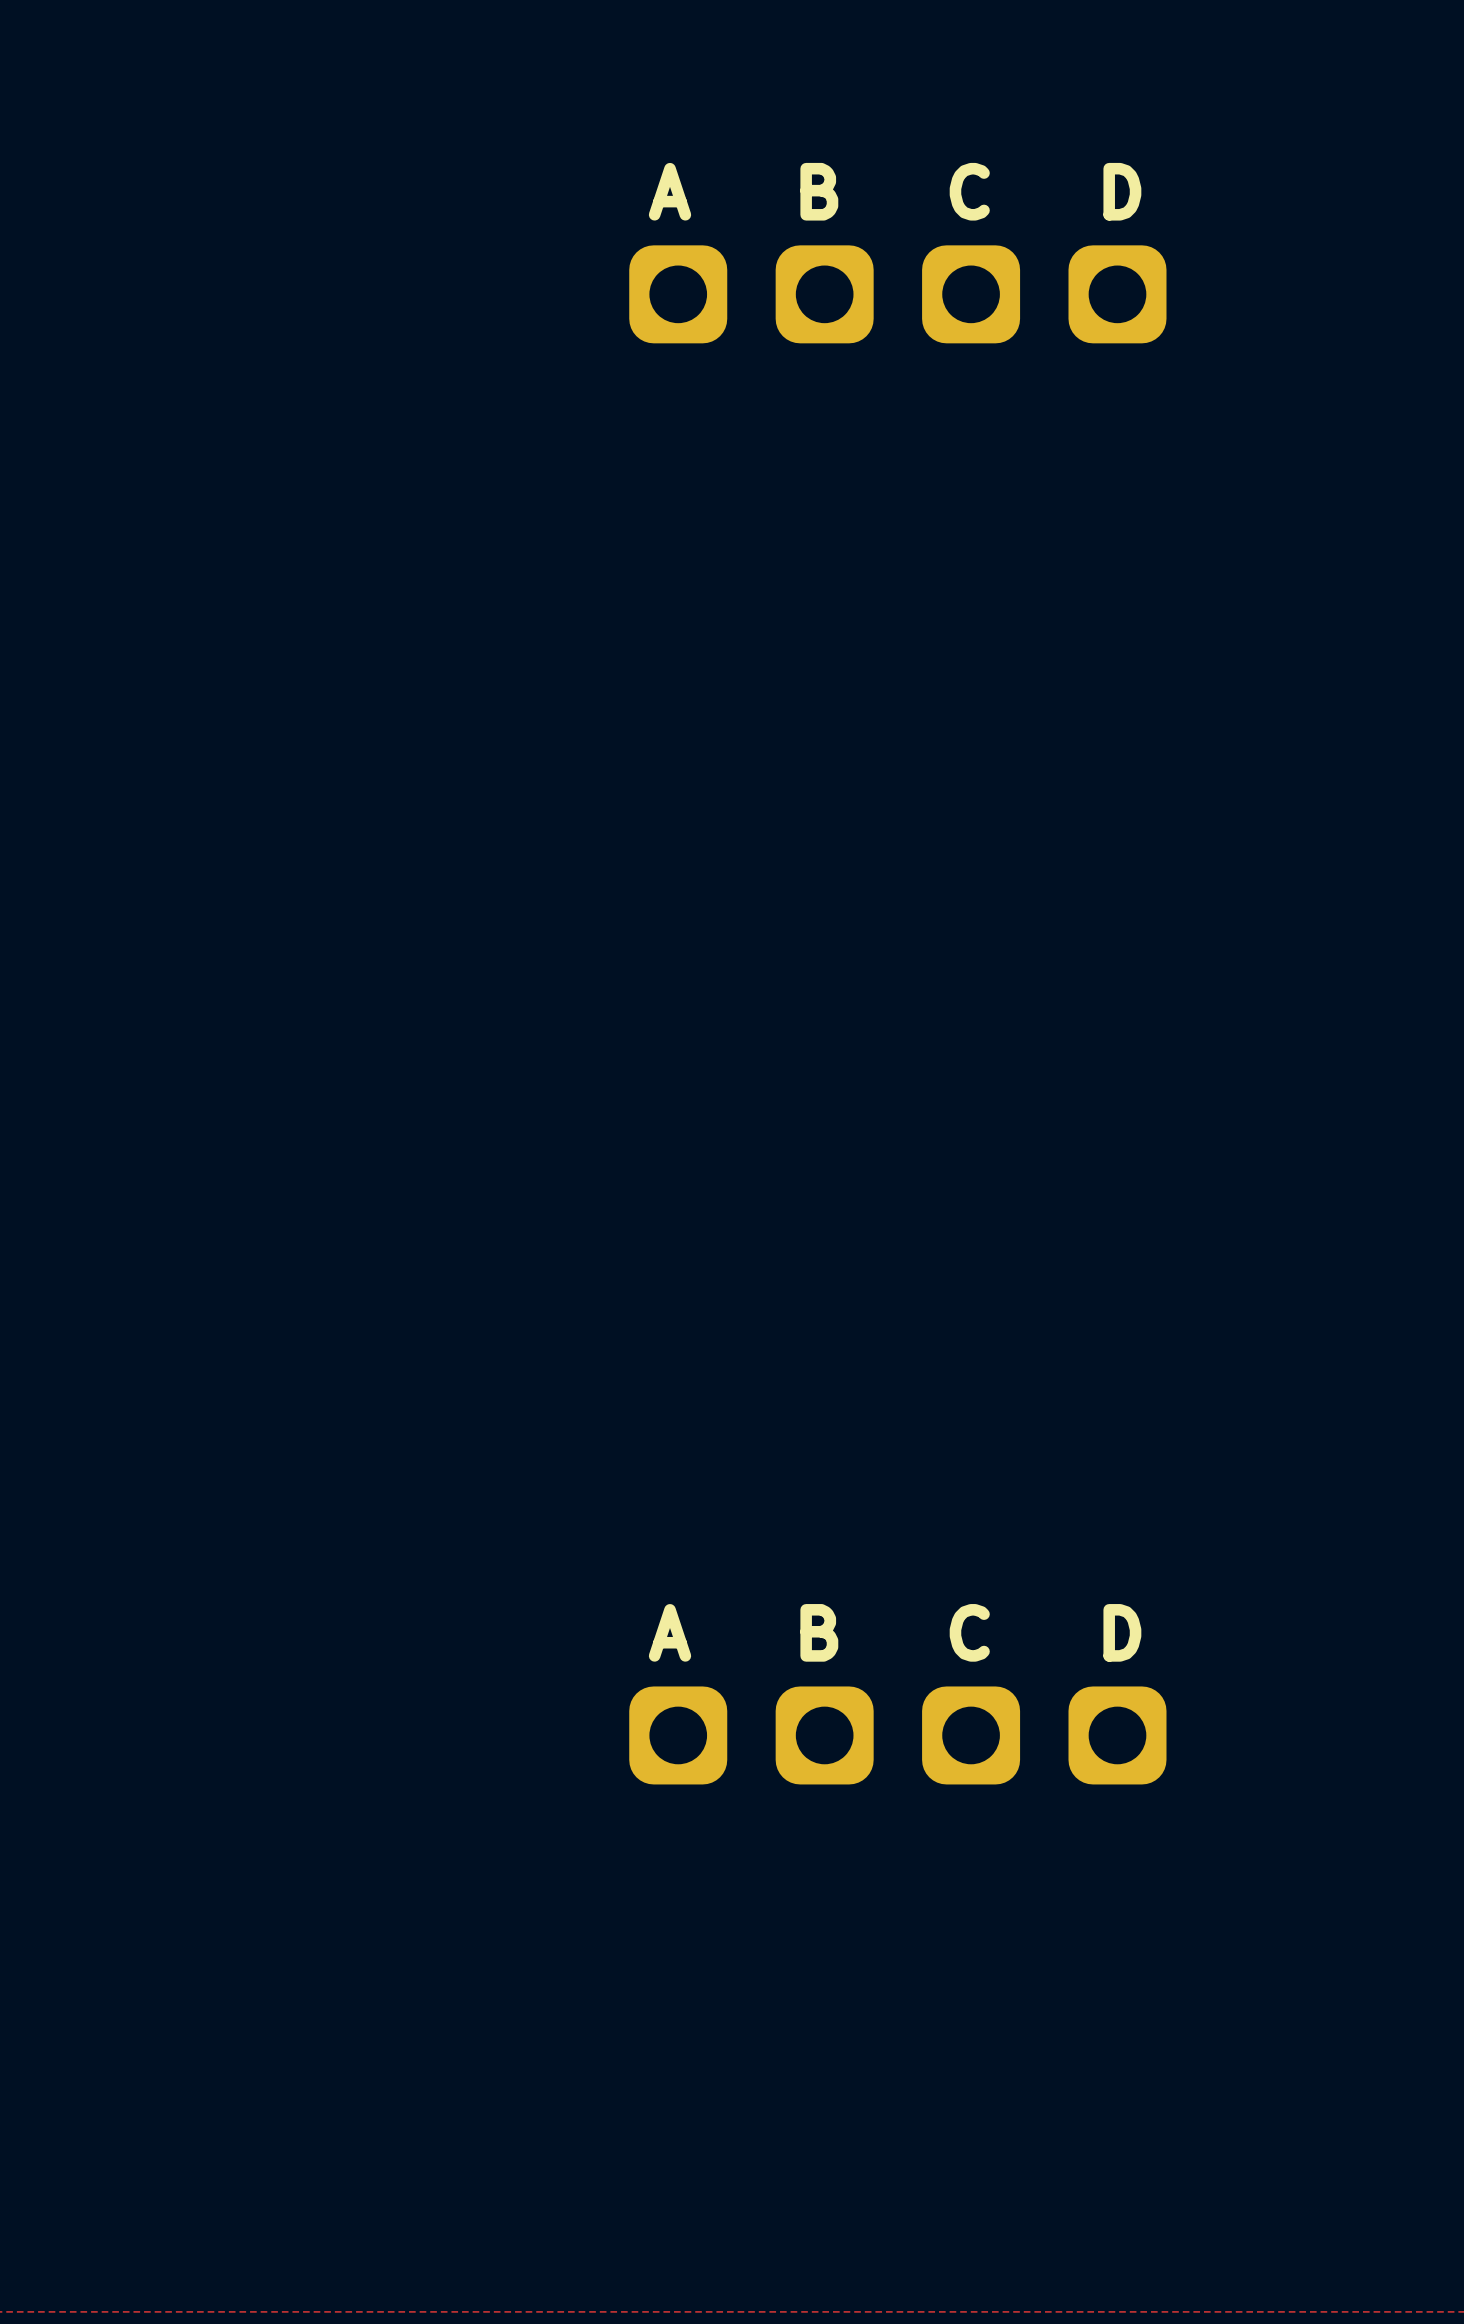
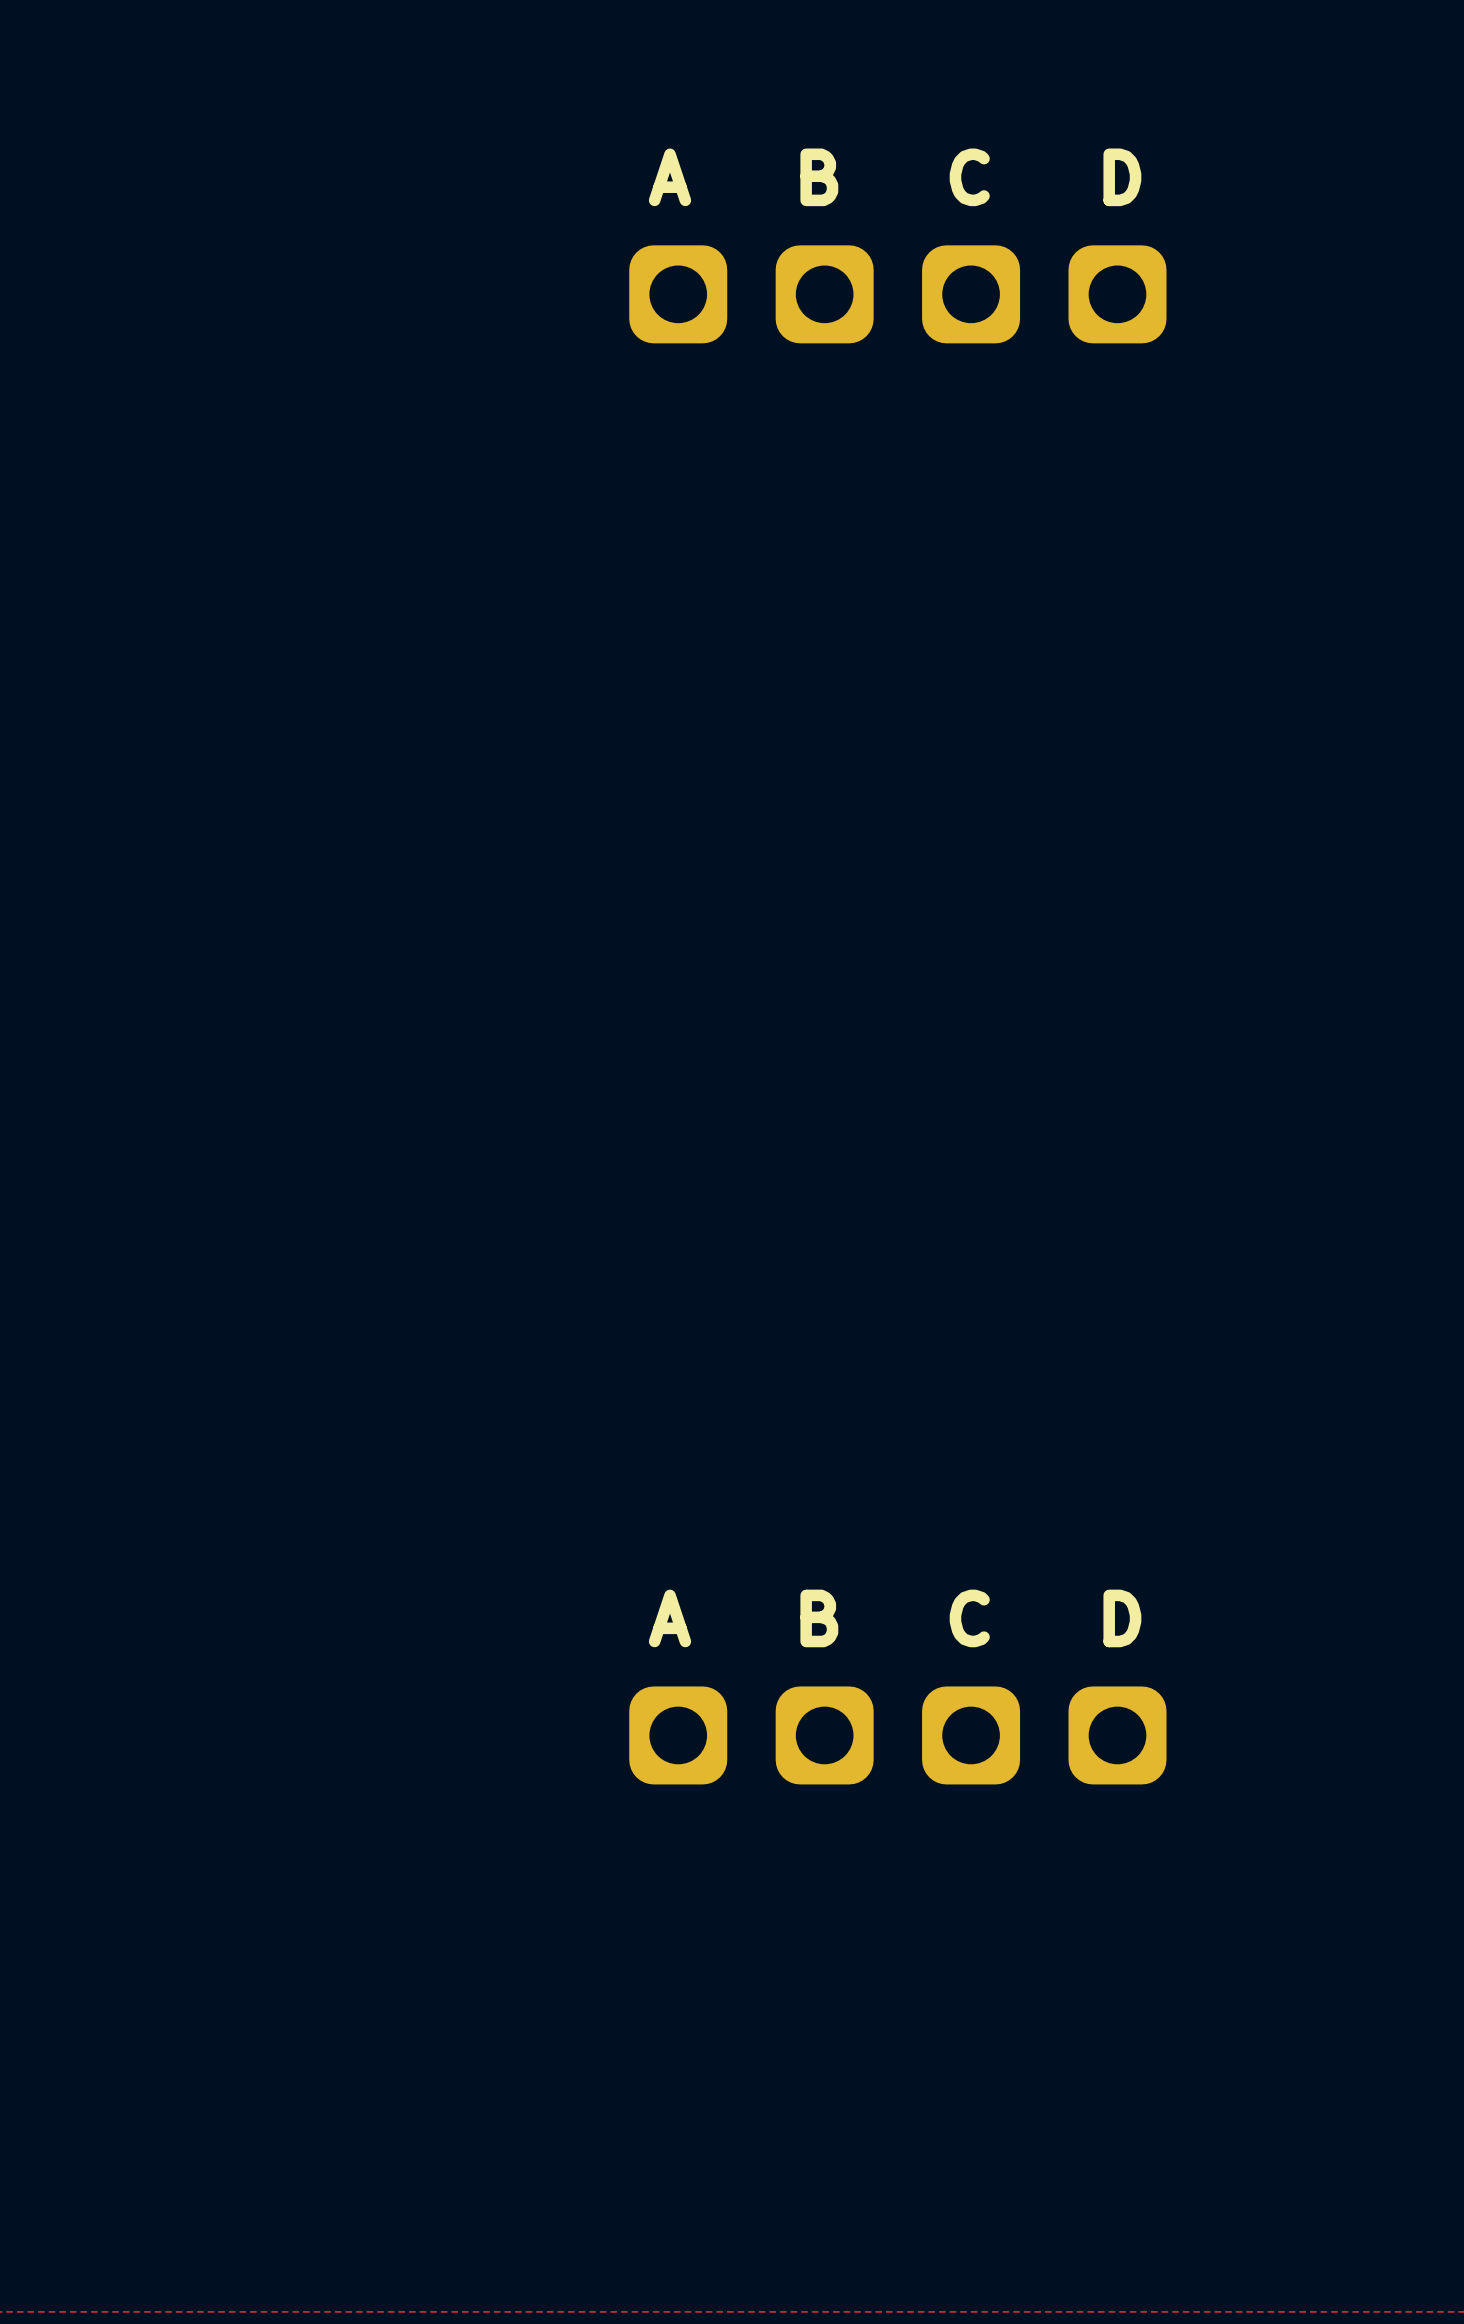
text position: A B C D (895, 191) -> A B C D (895, 177)
text position: A B C D (895, 1632) -> A B C D (895, 1618)

